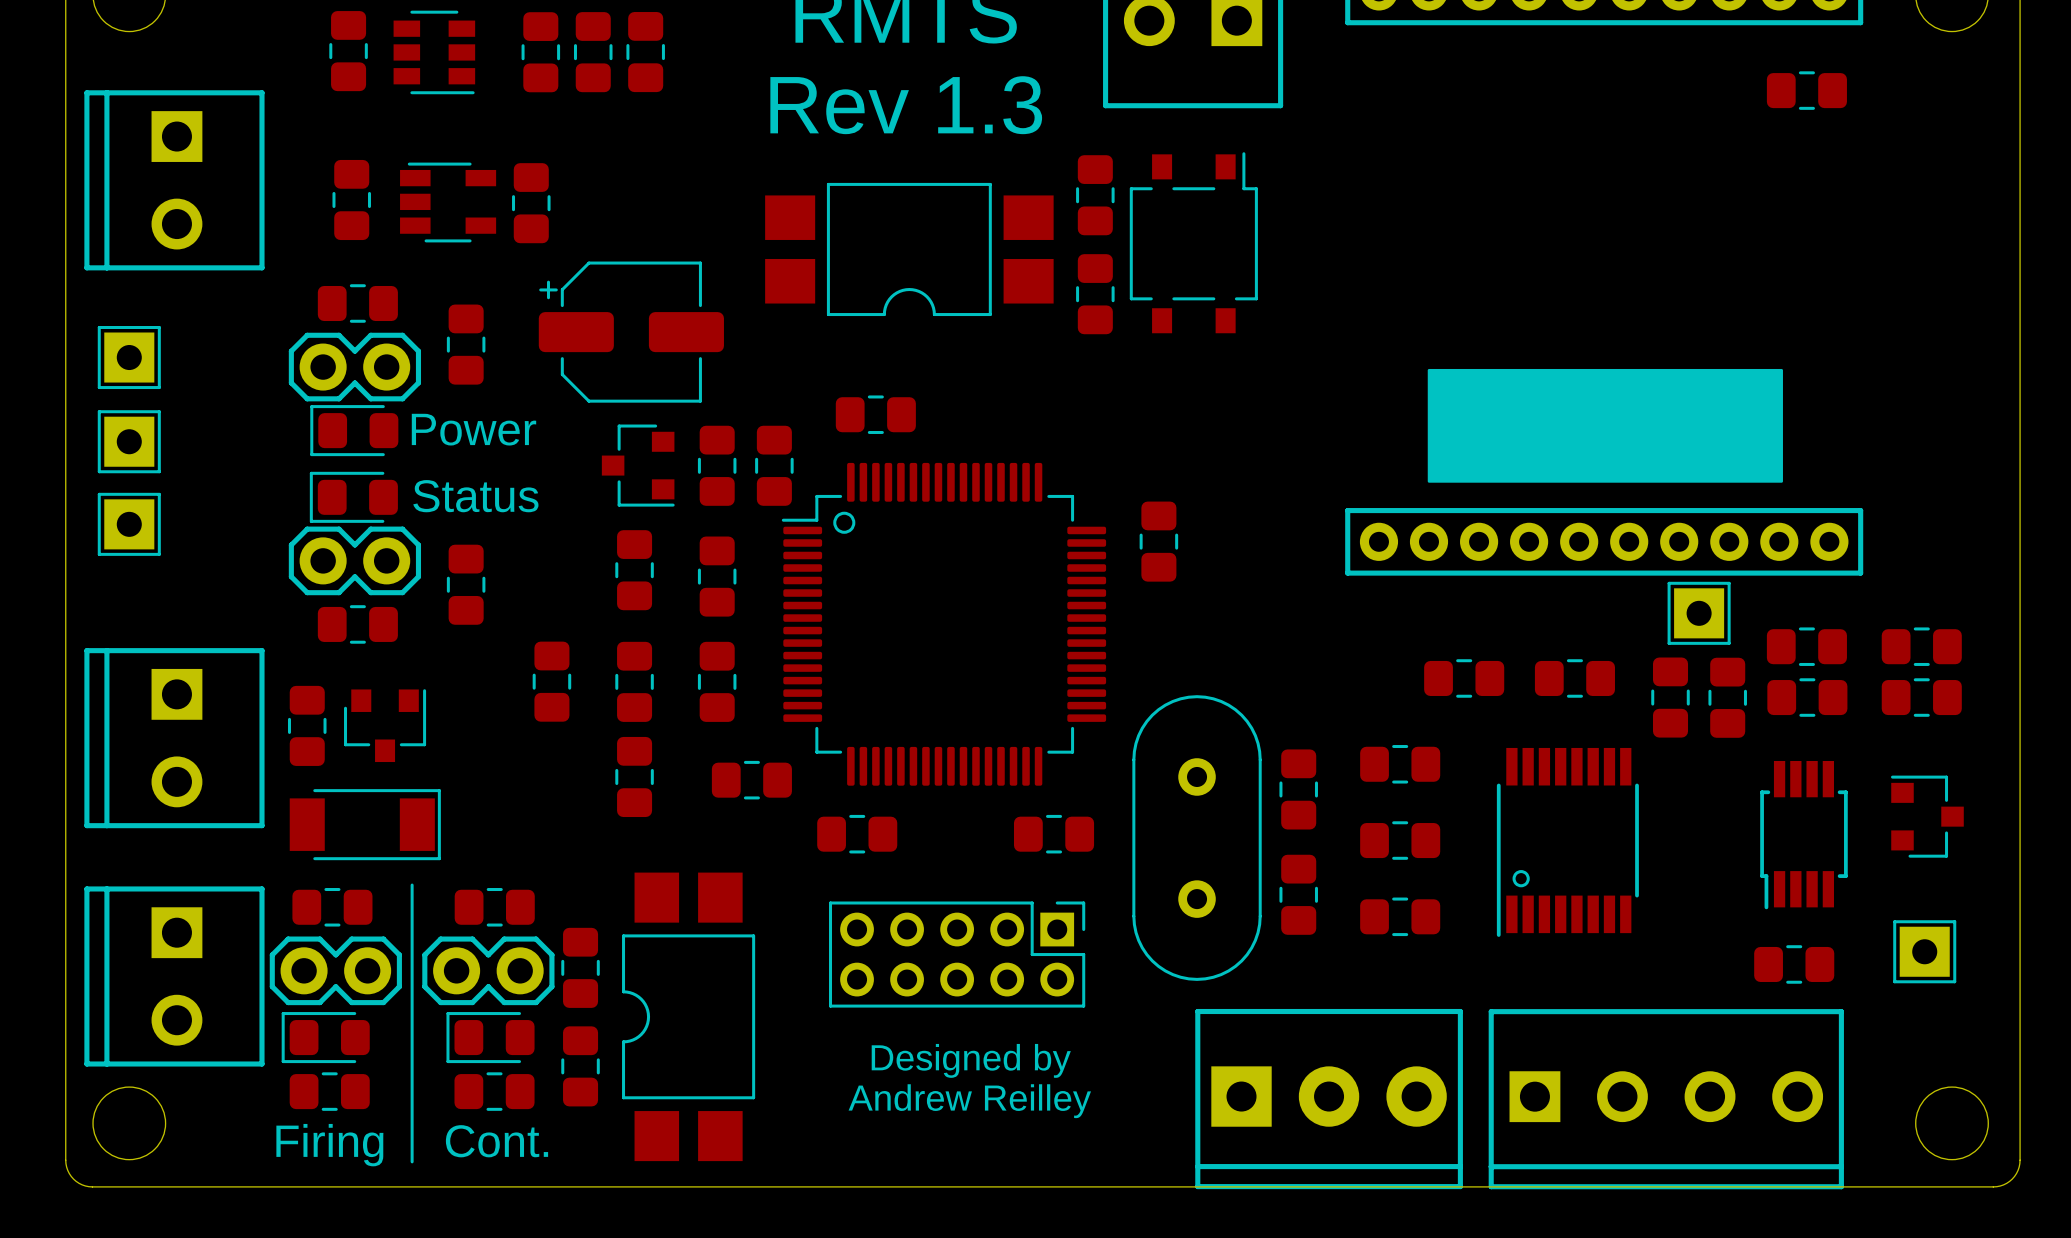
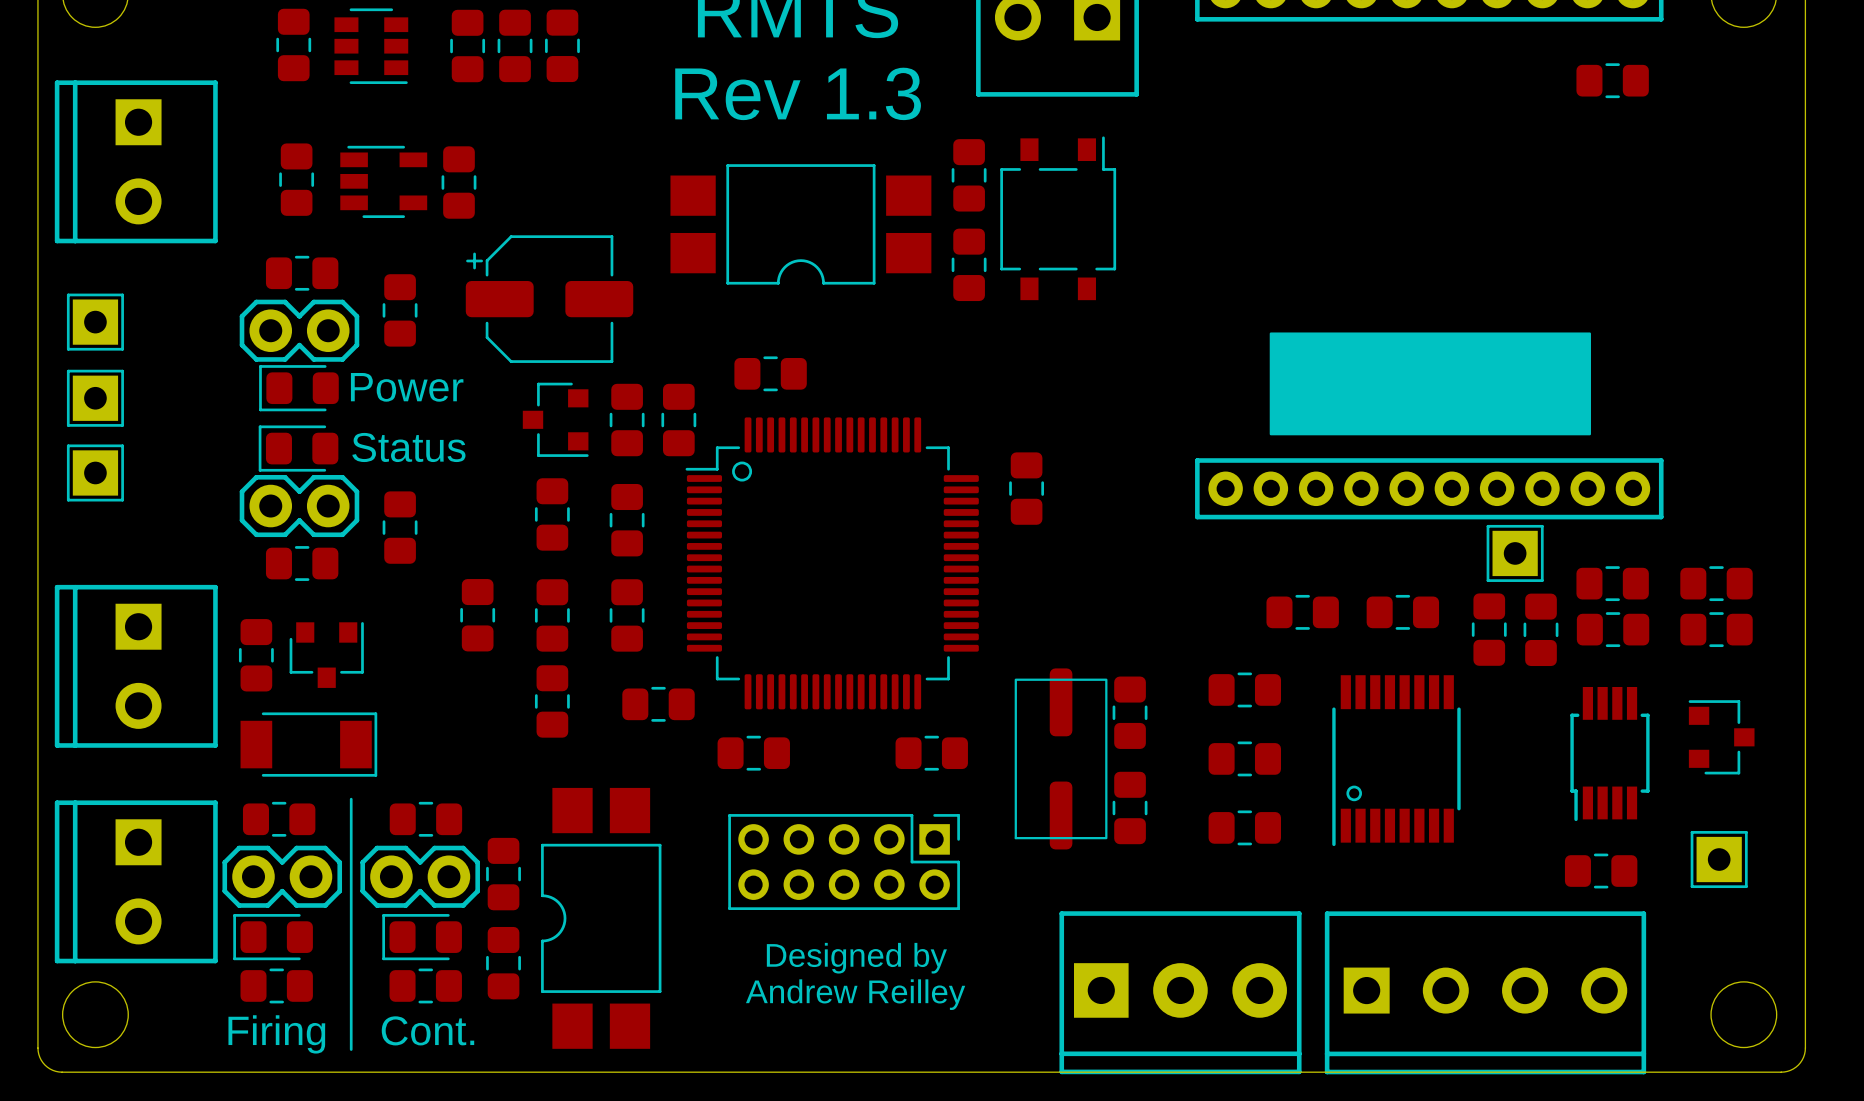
part footprint: [1132, 695, 1262, 981] -> [1014, 668, 1108, 850]
part position: (1298, 789) -> (1130, 712)
part position: (1298, 894) -> (1130, 807)

